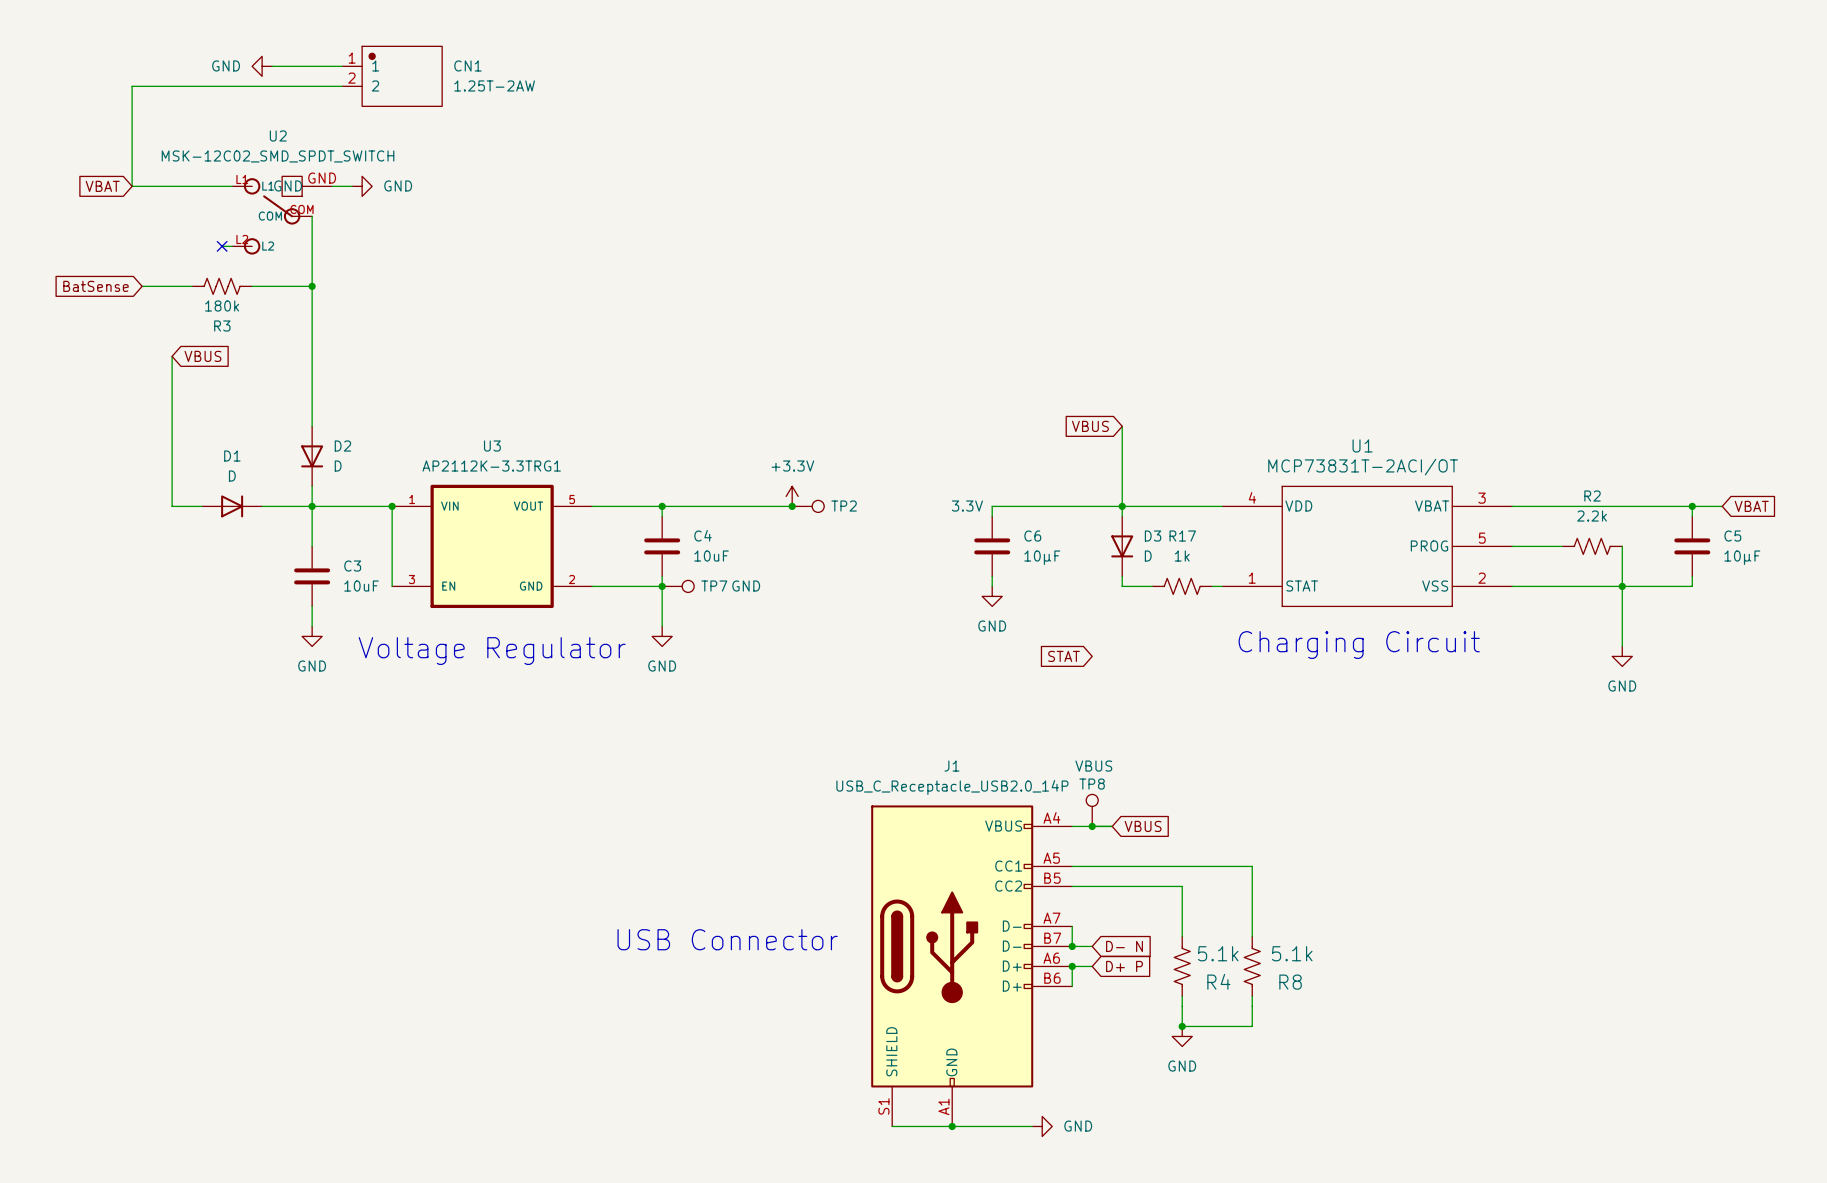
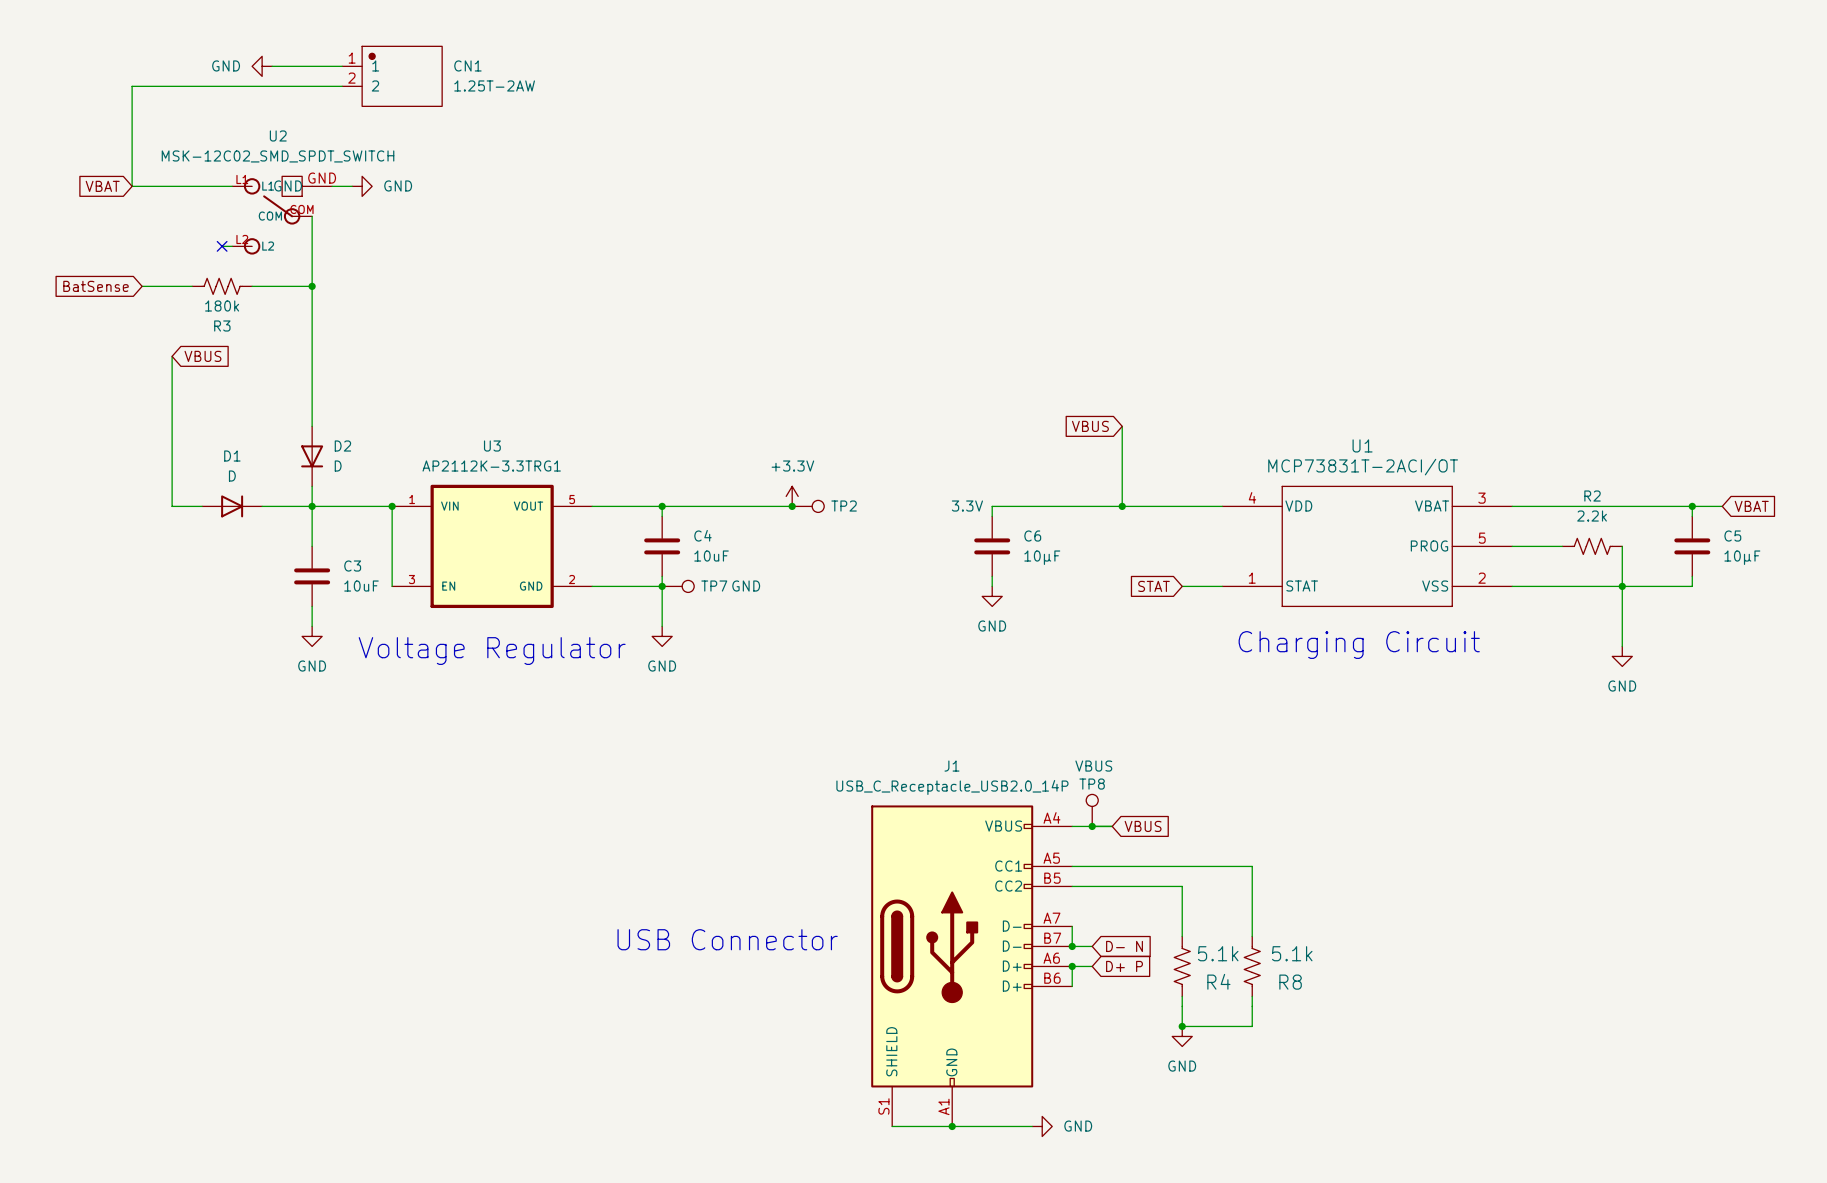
wire: (1122, 506) (1122, 516) -> none
D3: D (1122, 546) -> none
wire: (1122, 576) (1122, 586) (1152, 586) -> none
R17: 1k (1182, 586) -> none
global label position: STAT (1063, 656) -> STAT (1154, 586)

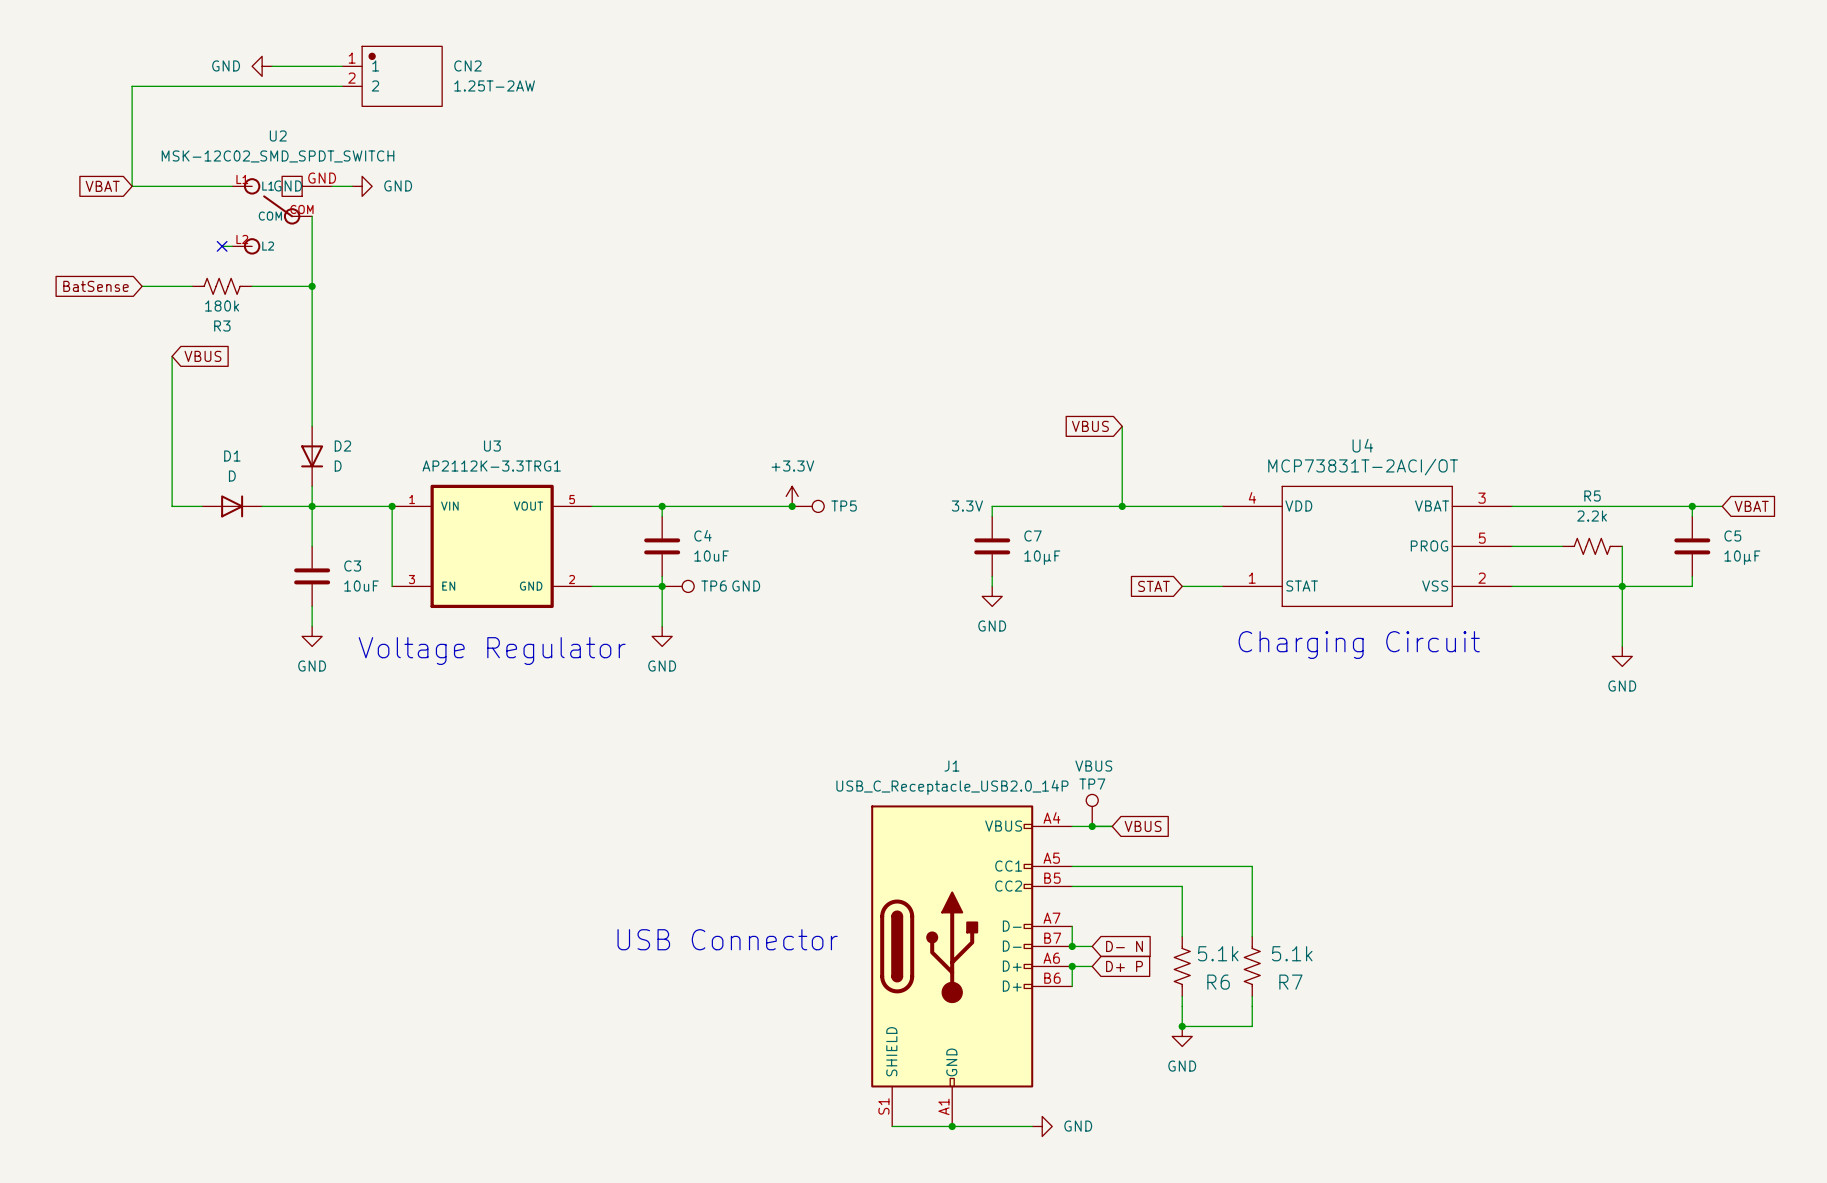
CN1 name: CN1 (467, 65) -> CN2 (467, 65)
U1 name: U1 (1362, 445) -> U4 (1362, 445)
R2 name: R2 (1592, 496) -> R5 (1592, 496)
TP2 name: TP2 (844, 506) -> TP5 (844, 506)
C6 name: C6 (1032, 536) -> C7 (1033, 536)
TP7 name: TP7 (714, 586) -> TP6 (714, 586)
TP8 name: TP8 (1092, 784) -> TP7 (1092, 784)
R4 name: R4 (1218, 981) -> R6 (1218, 982)
R8 name: R8 (1290, 982) -> R7 (1290, 982)

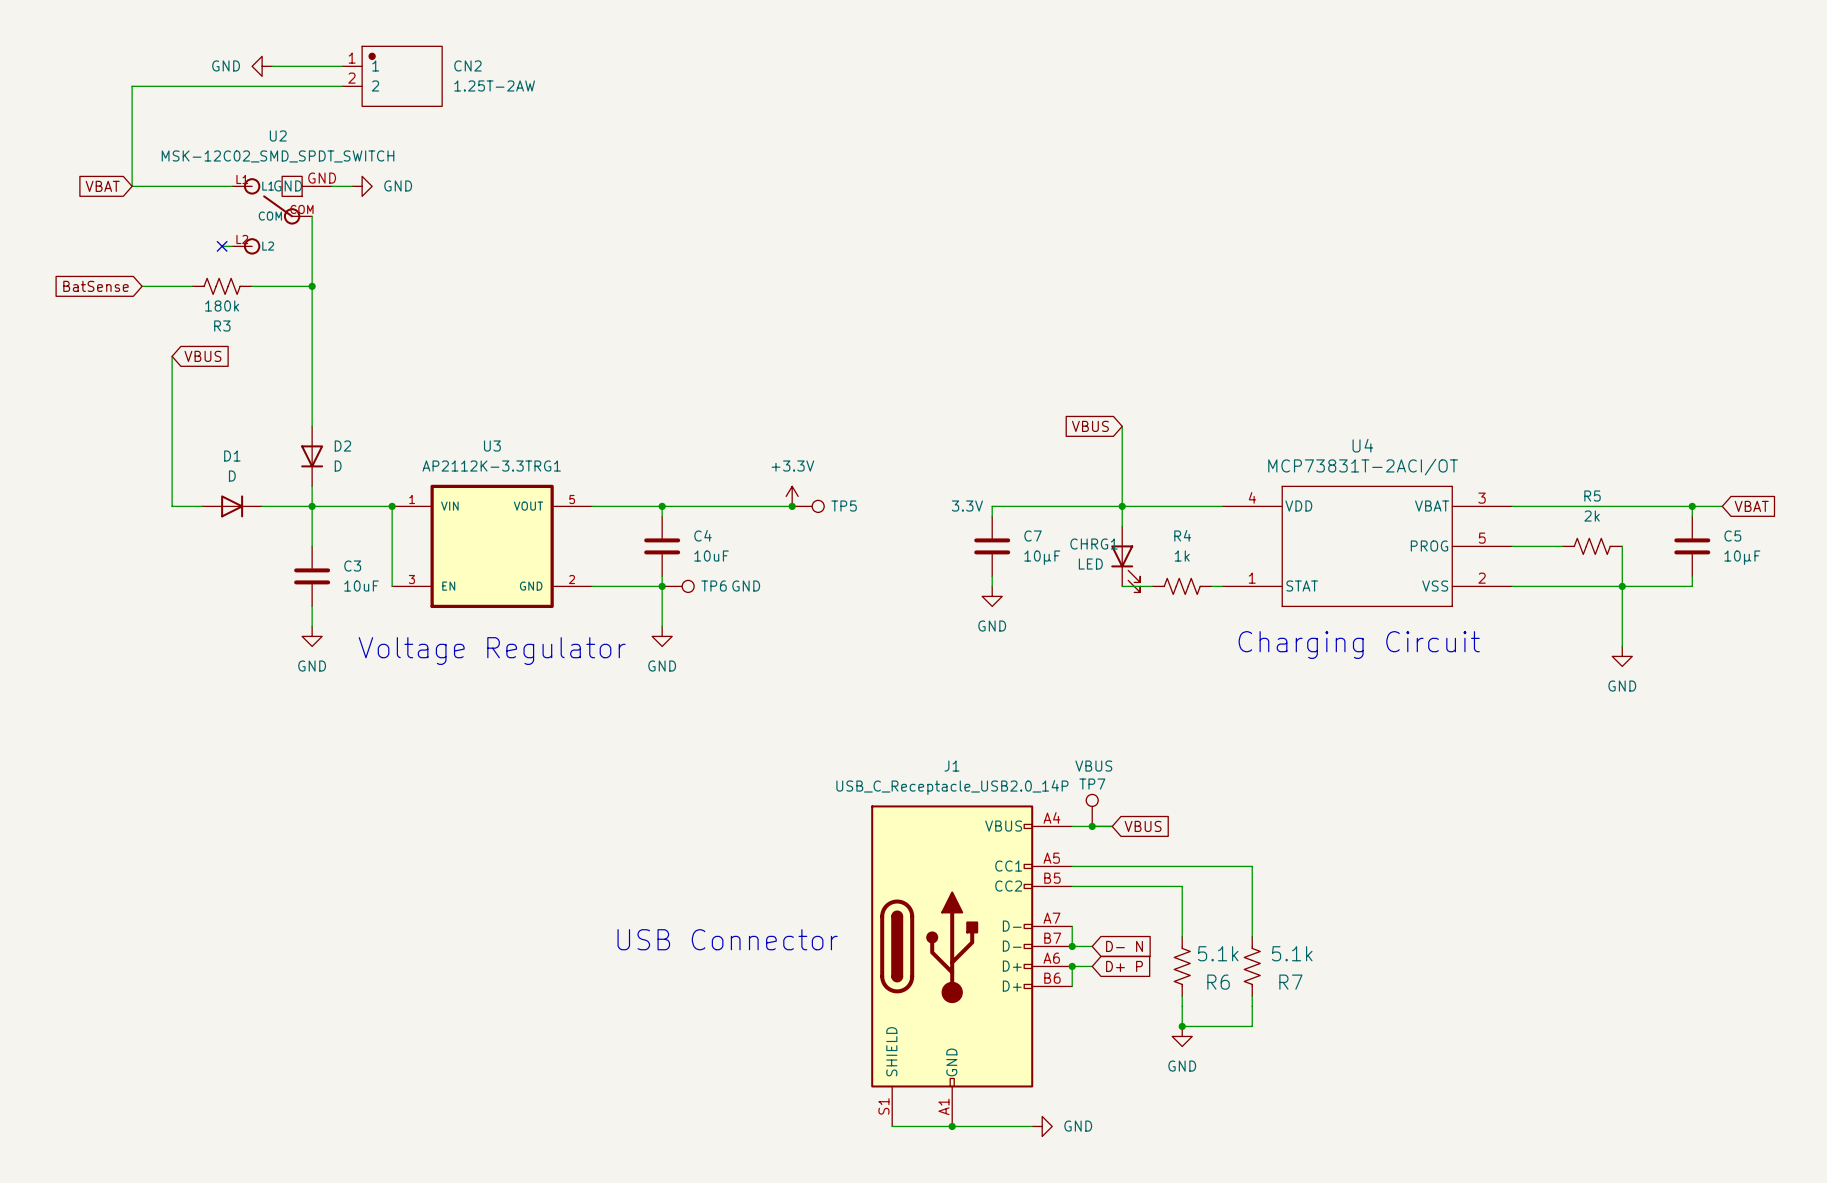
wire: none -> (1122, 506) (1122, 526)
R5 value: 2.2k (1592, 516) -> 2k (1592, 516)
CHRG1: none -> LED (1125, 559)
global label: STAT (1154, 586) -> none
R4: none -> 1k (1182, 586)

